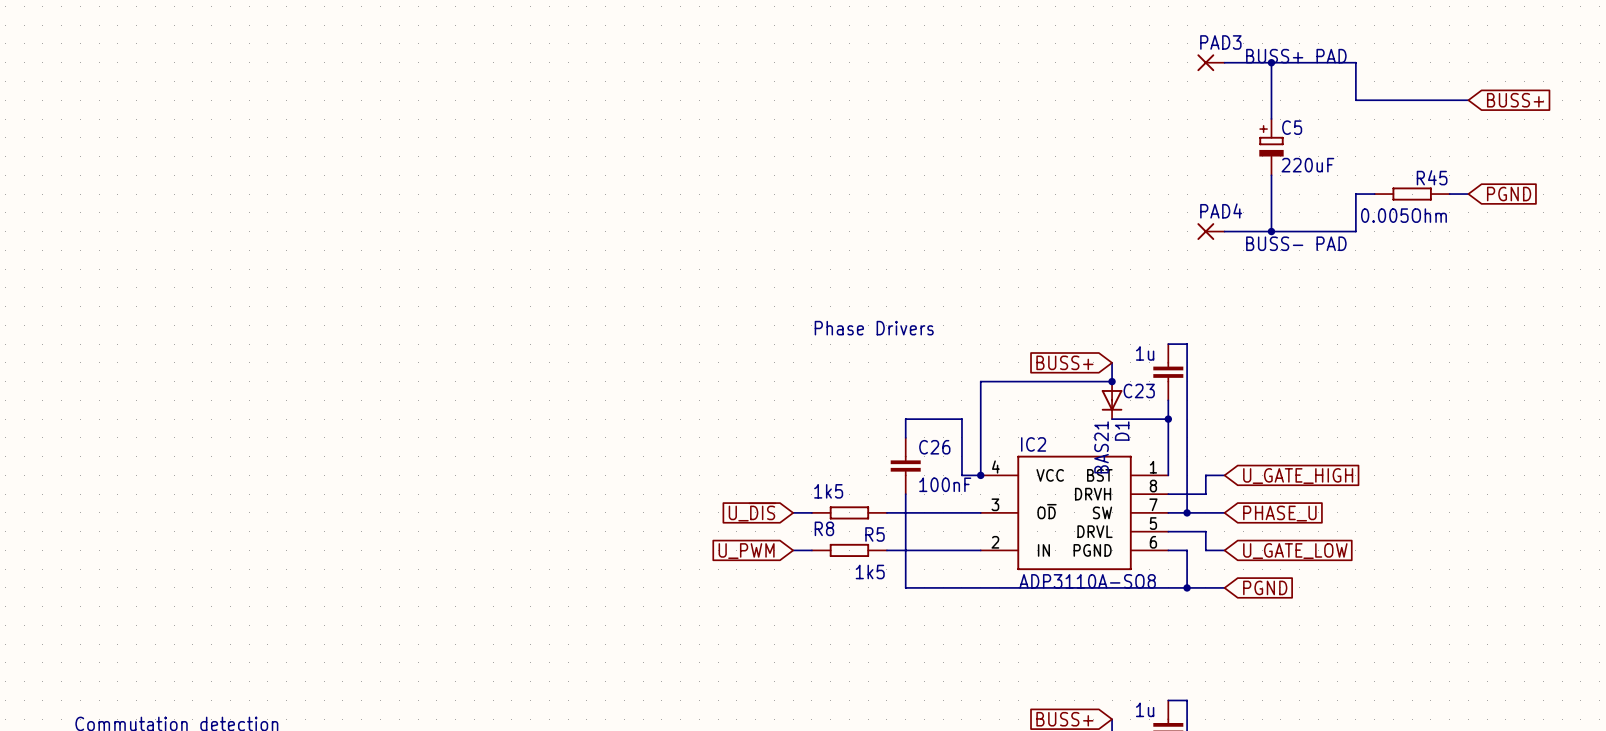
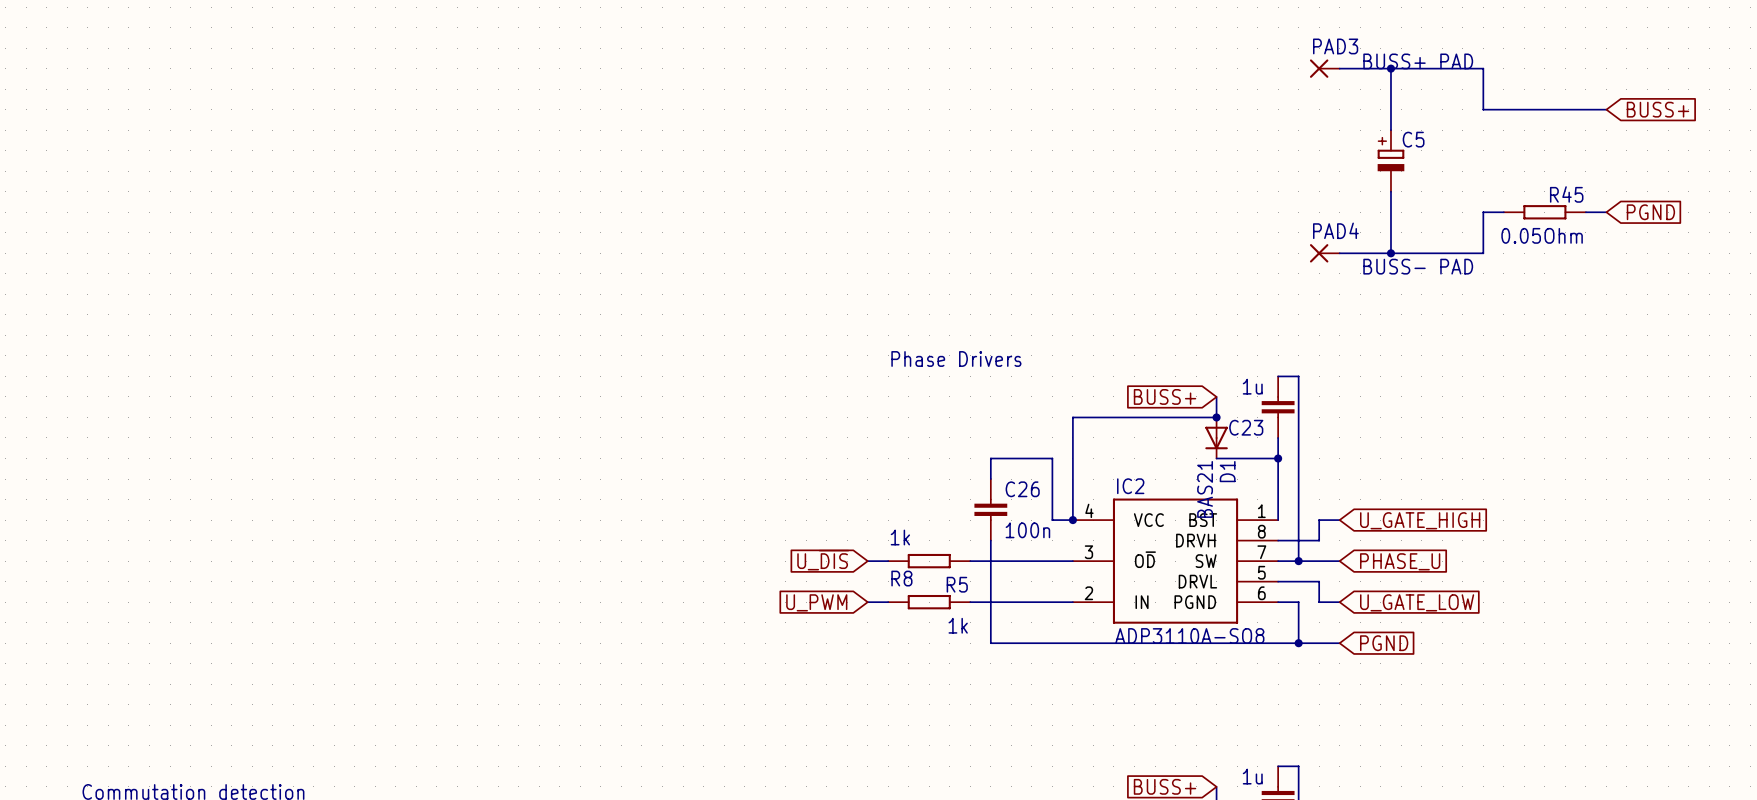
C5 value: 220uF (1307, 165) -> none
R45 value: 0.005Ohm (1403, 215) -> 0.05Ohm (1542, 235)
C26 value: 100nF (945, 484) -> 100n (1027, 530)
R8 value: 1k5 (828, 491) -> 1k (900, 537)
R5 value: 1k5 (870, 572) -> 1k (958, 625)

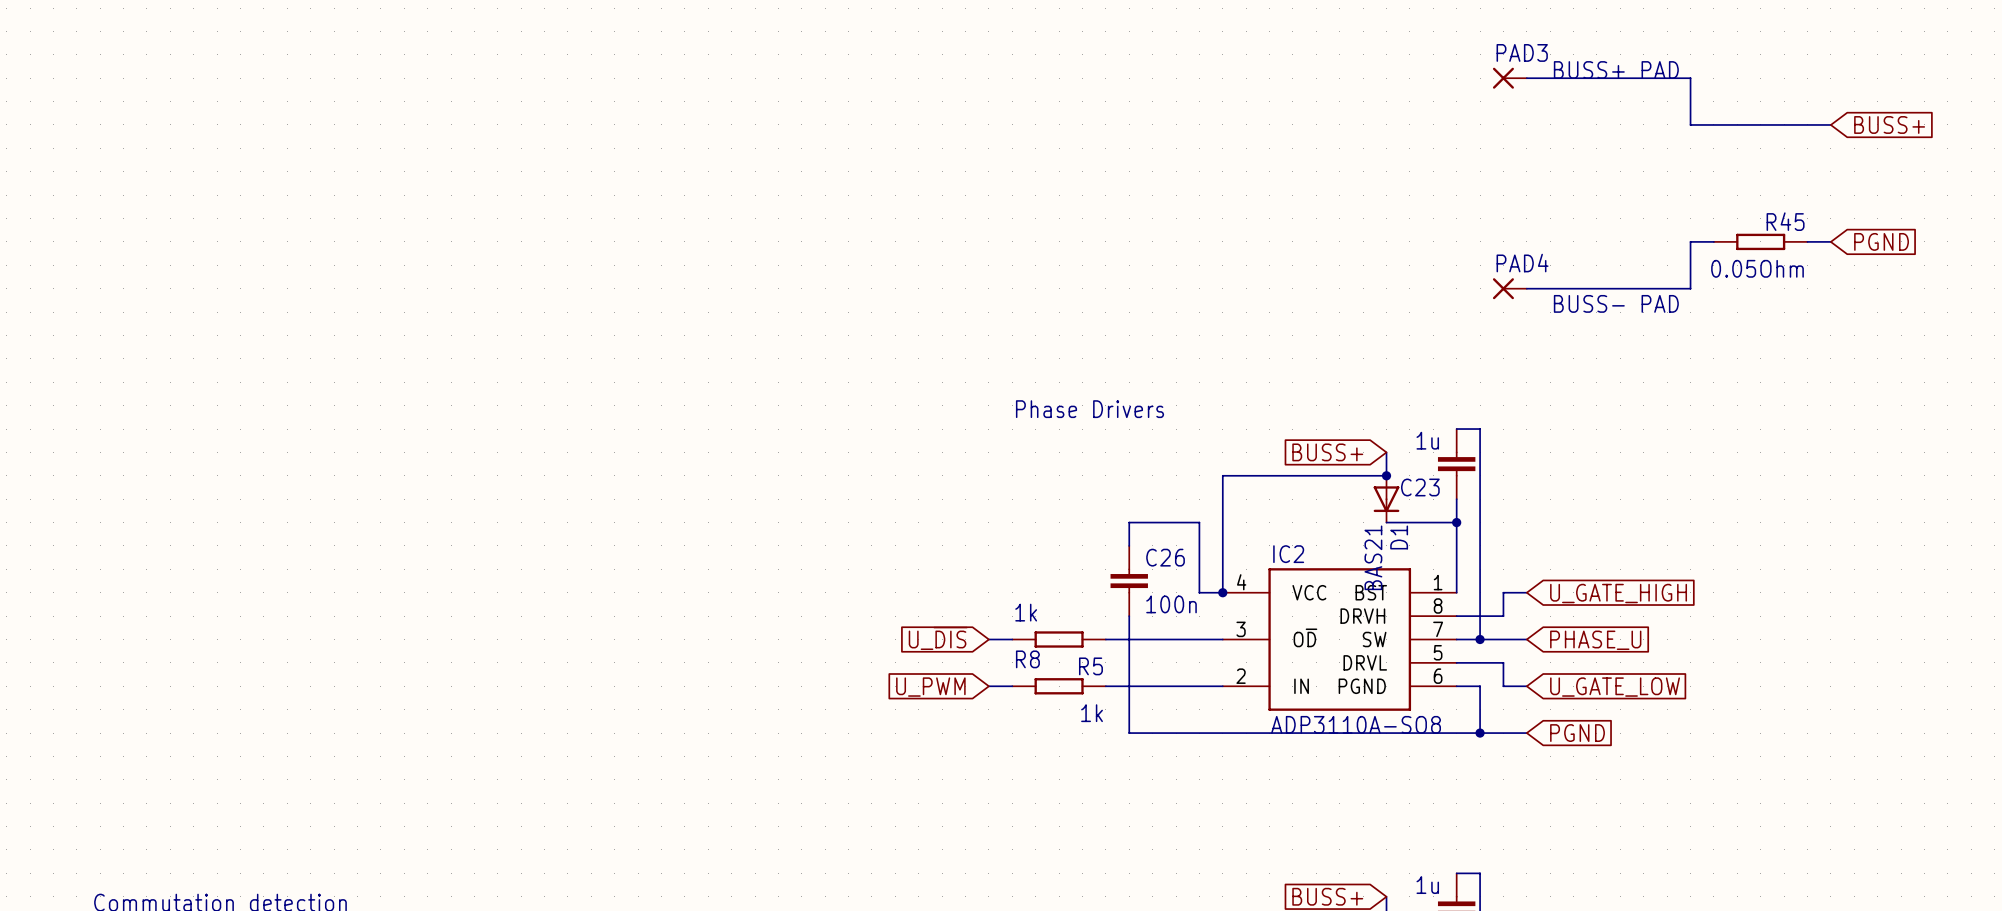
wire: (1390, 68) (1390, 130) -> none
junction: (1390, 68) -> none
C5: (1390, 160) -> none
wire: (1390, 191) (1390, 253) -> none
junction: (1390, 253) -> none

